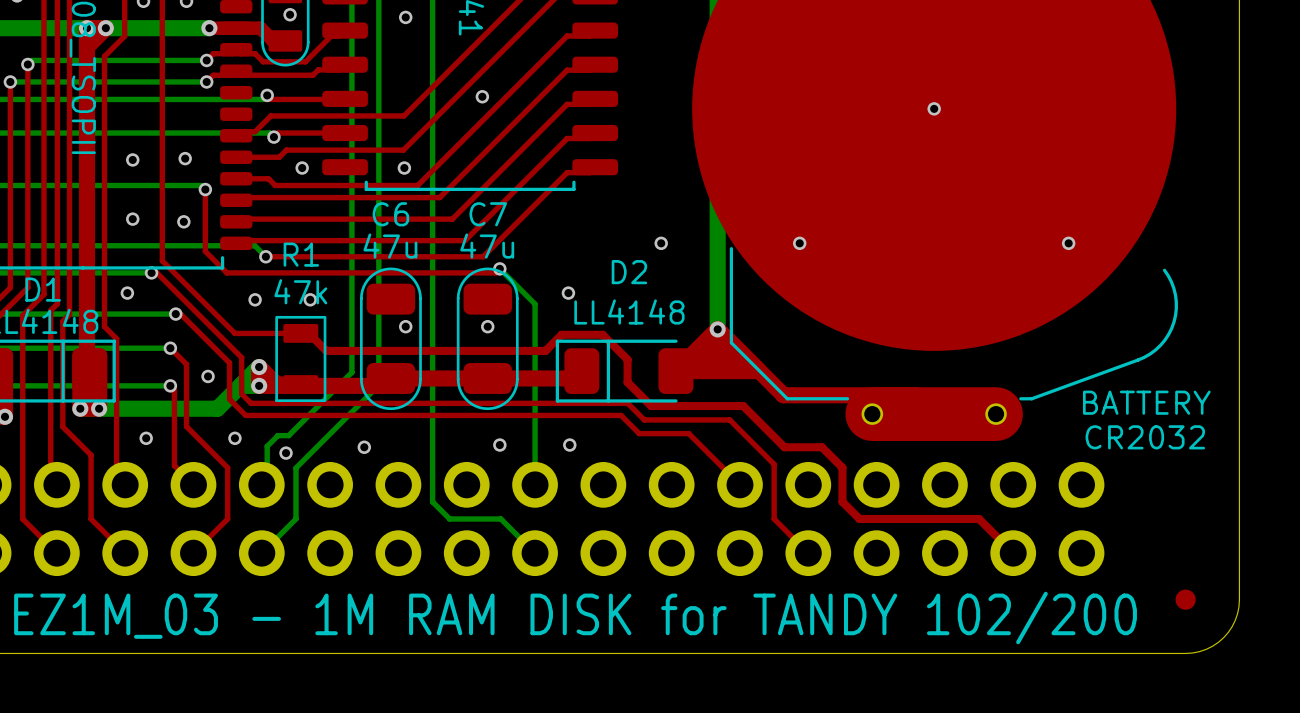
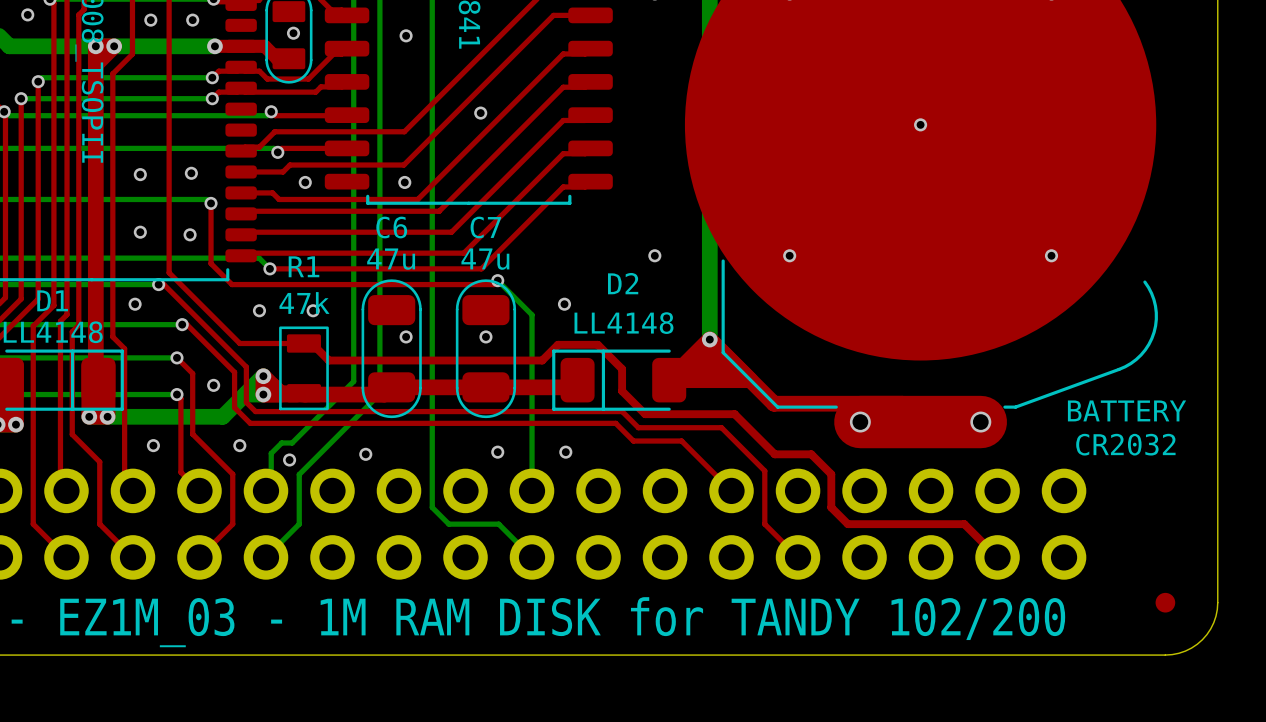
part: (872, 414) -> none
via: none -> (860, 422)
part: (996, 414) -> none
via: none -> (980, 422)

